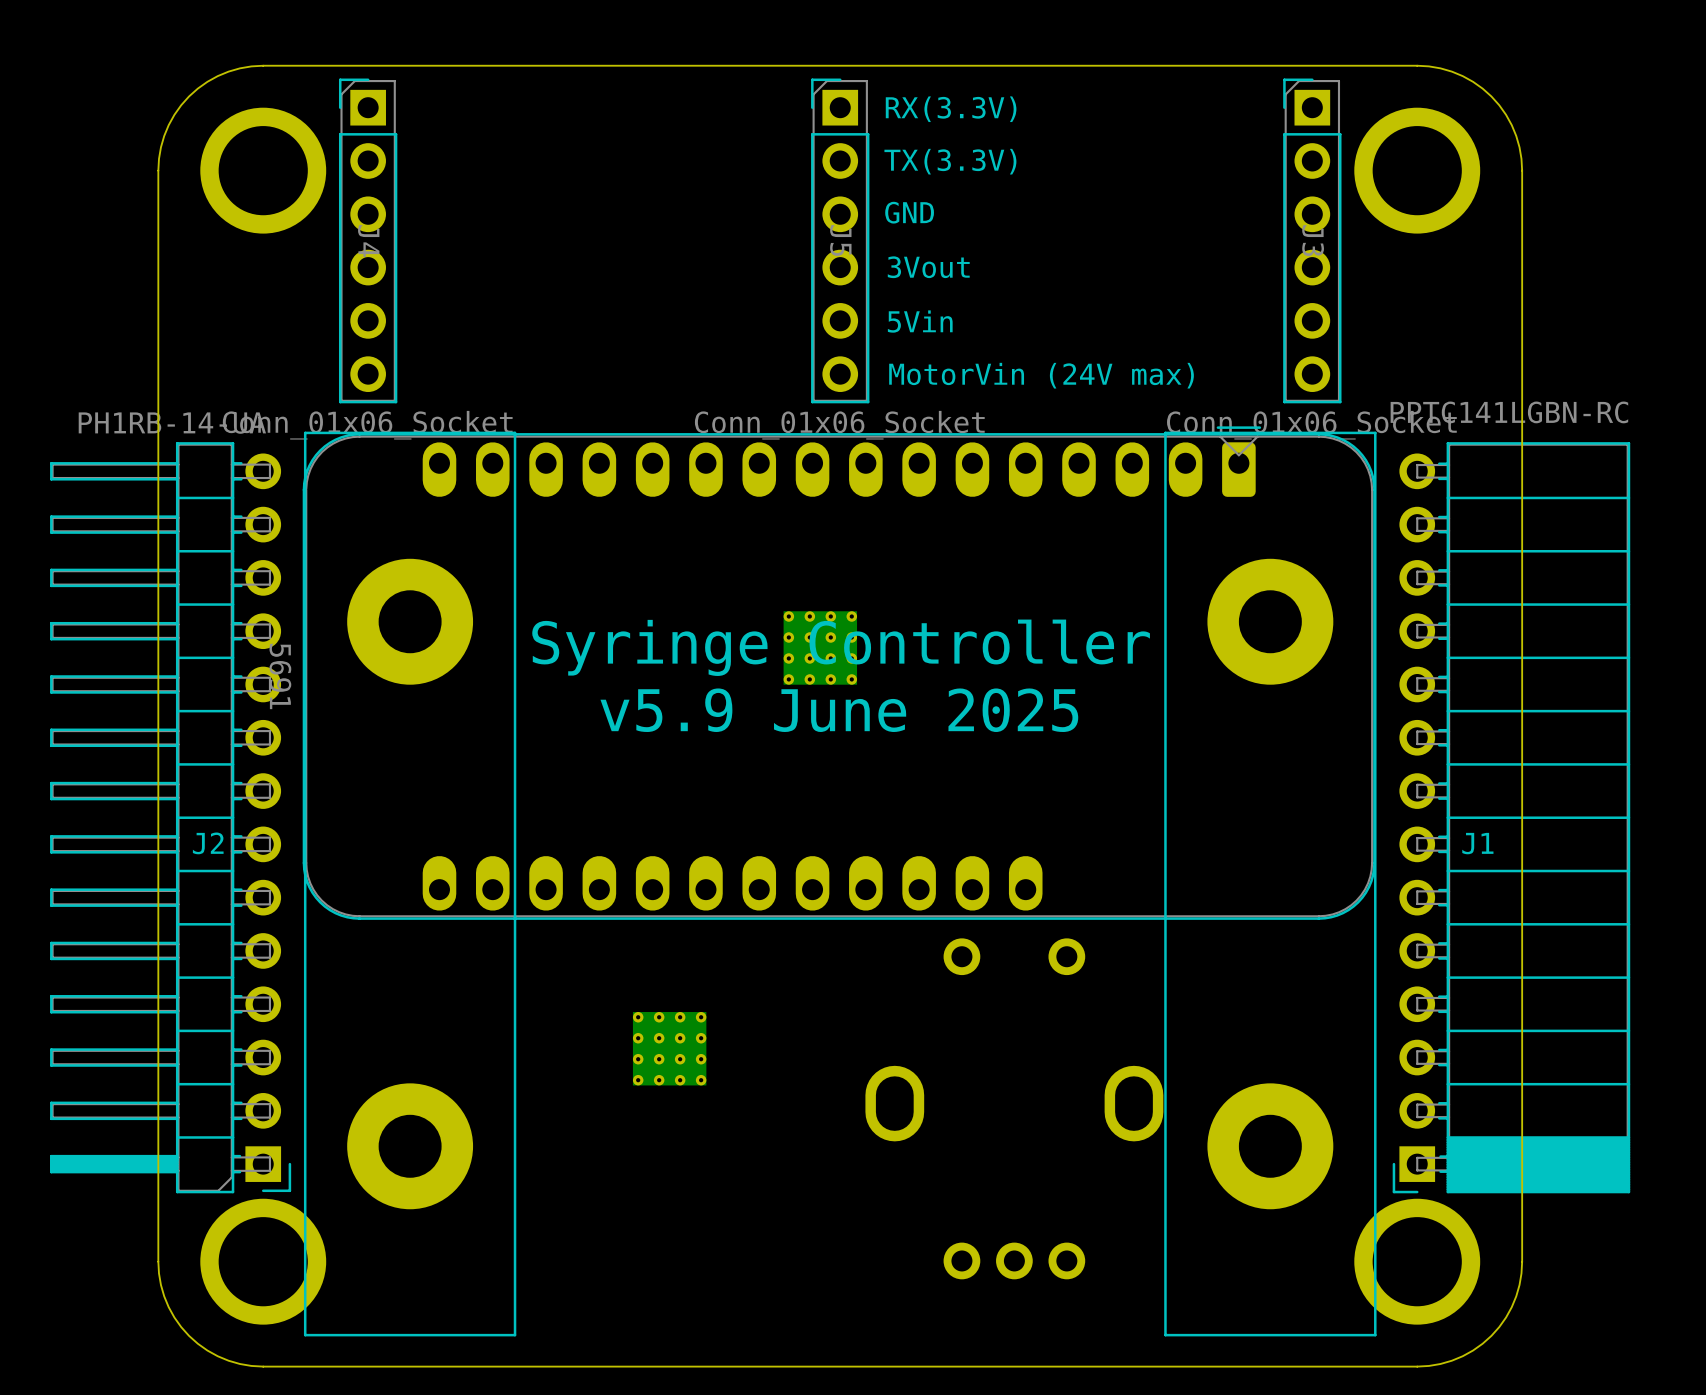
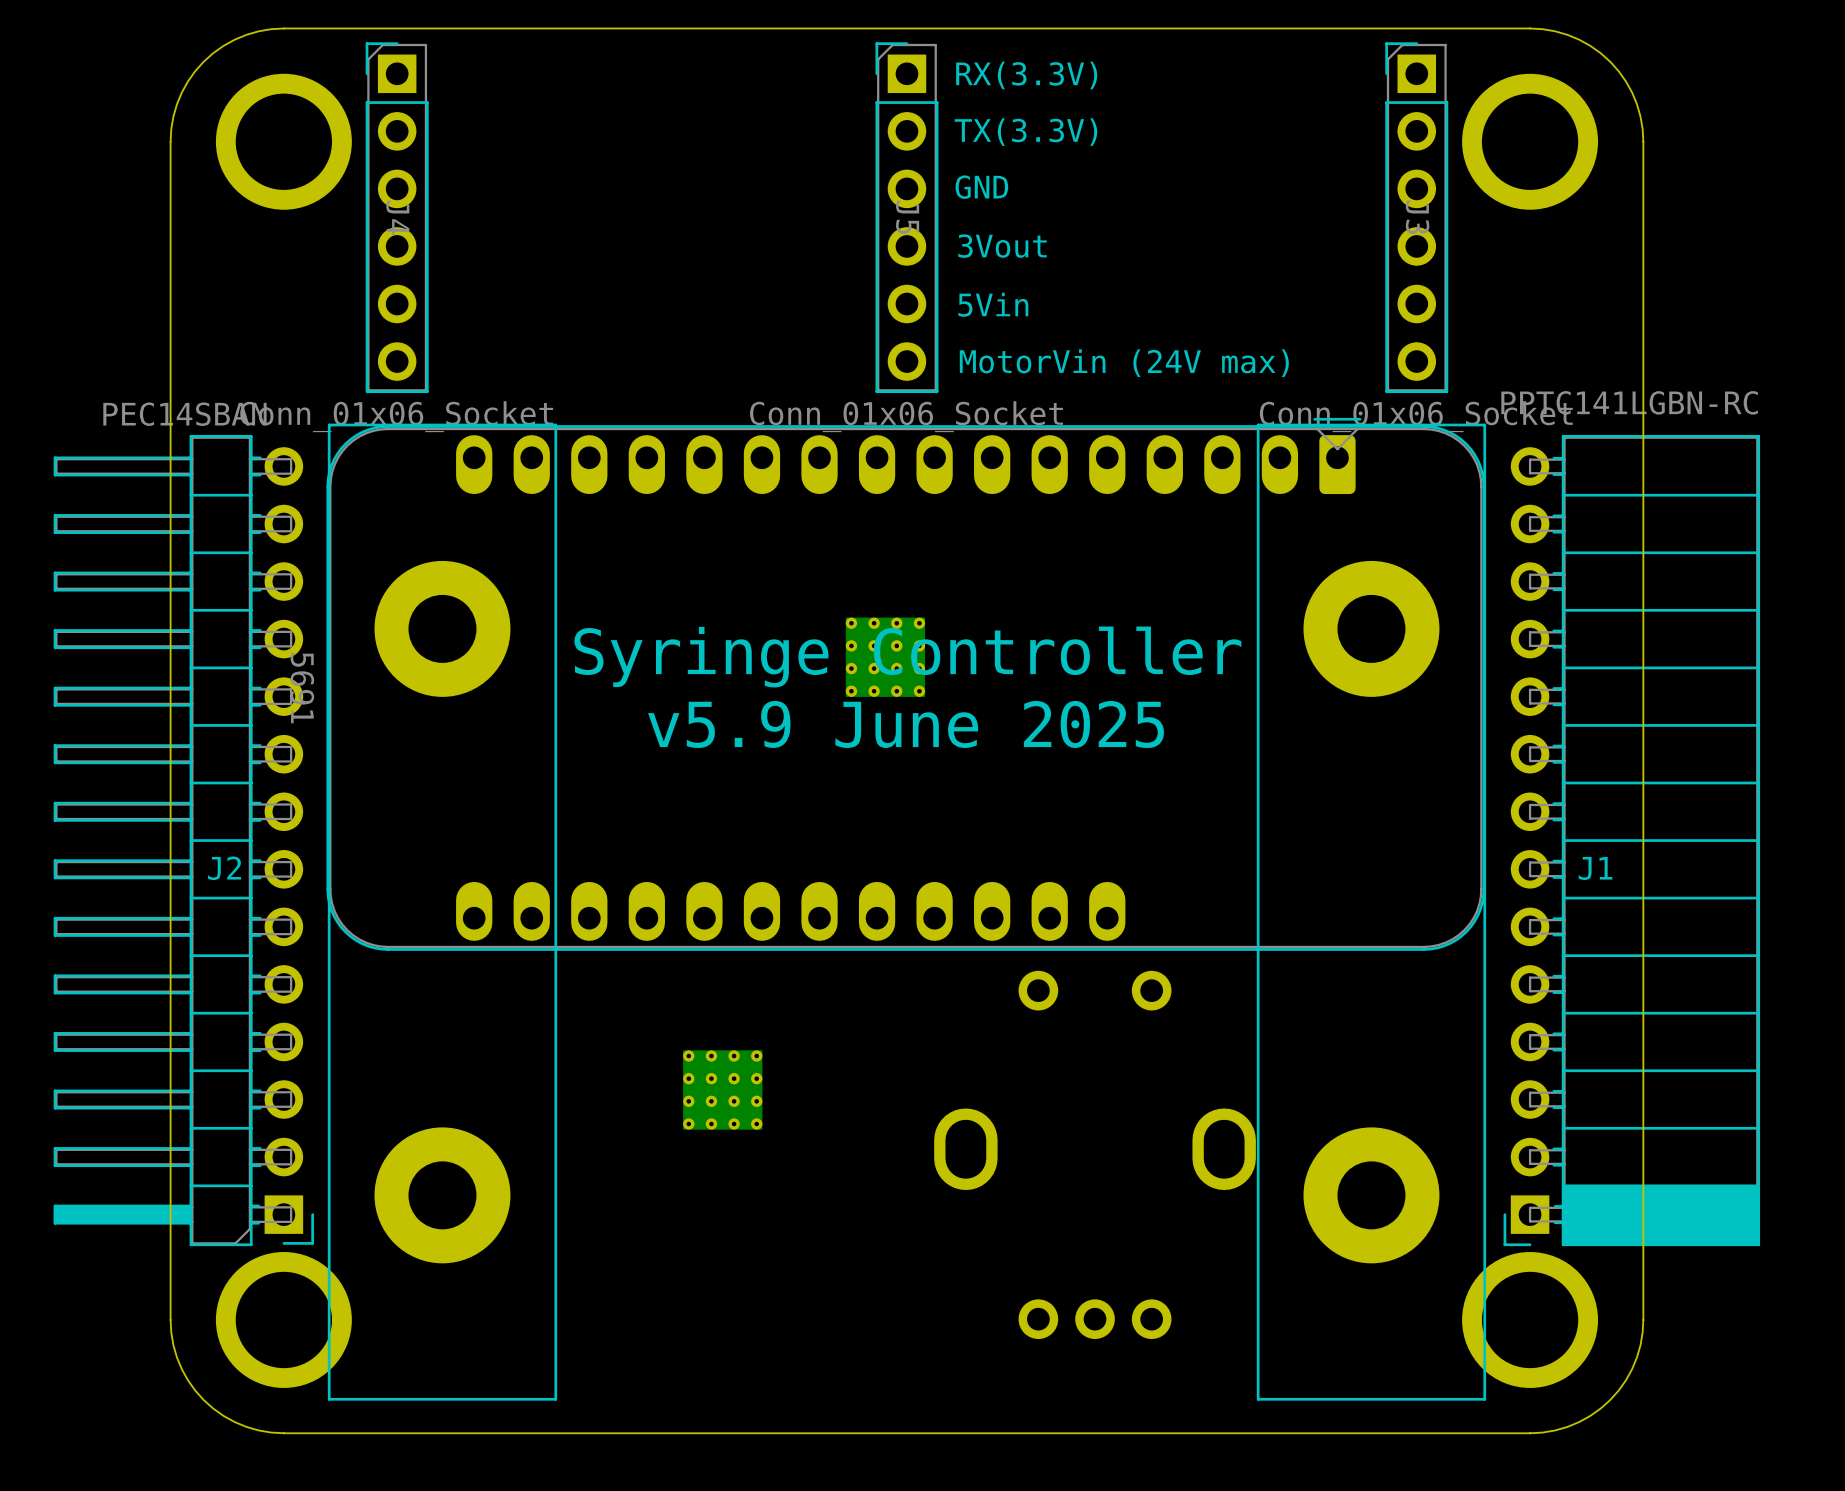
J2 value: PH1RB-14-UA (172, 423) -> PEC14SBAN (184, 414)

